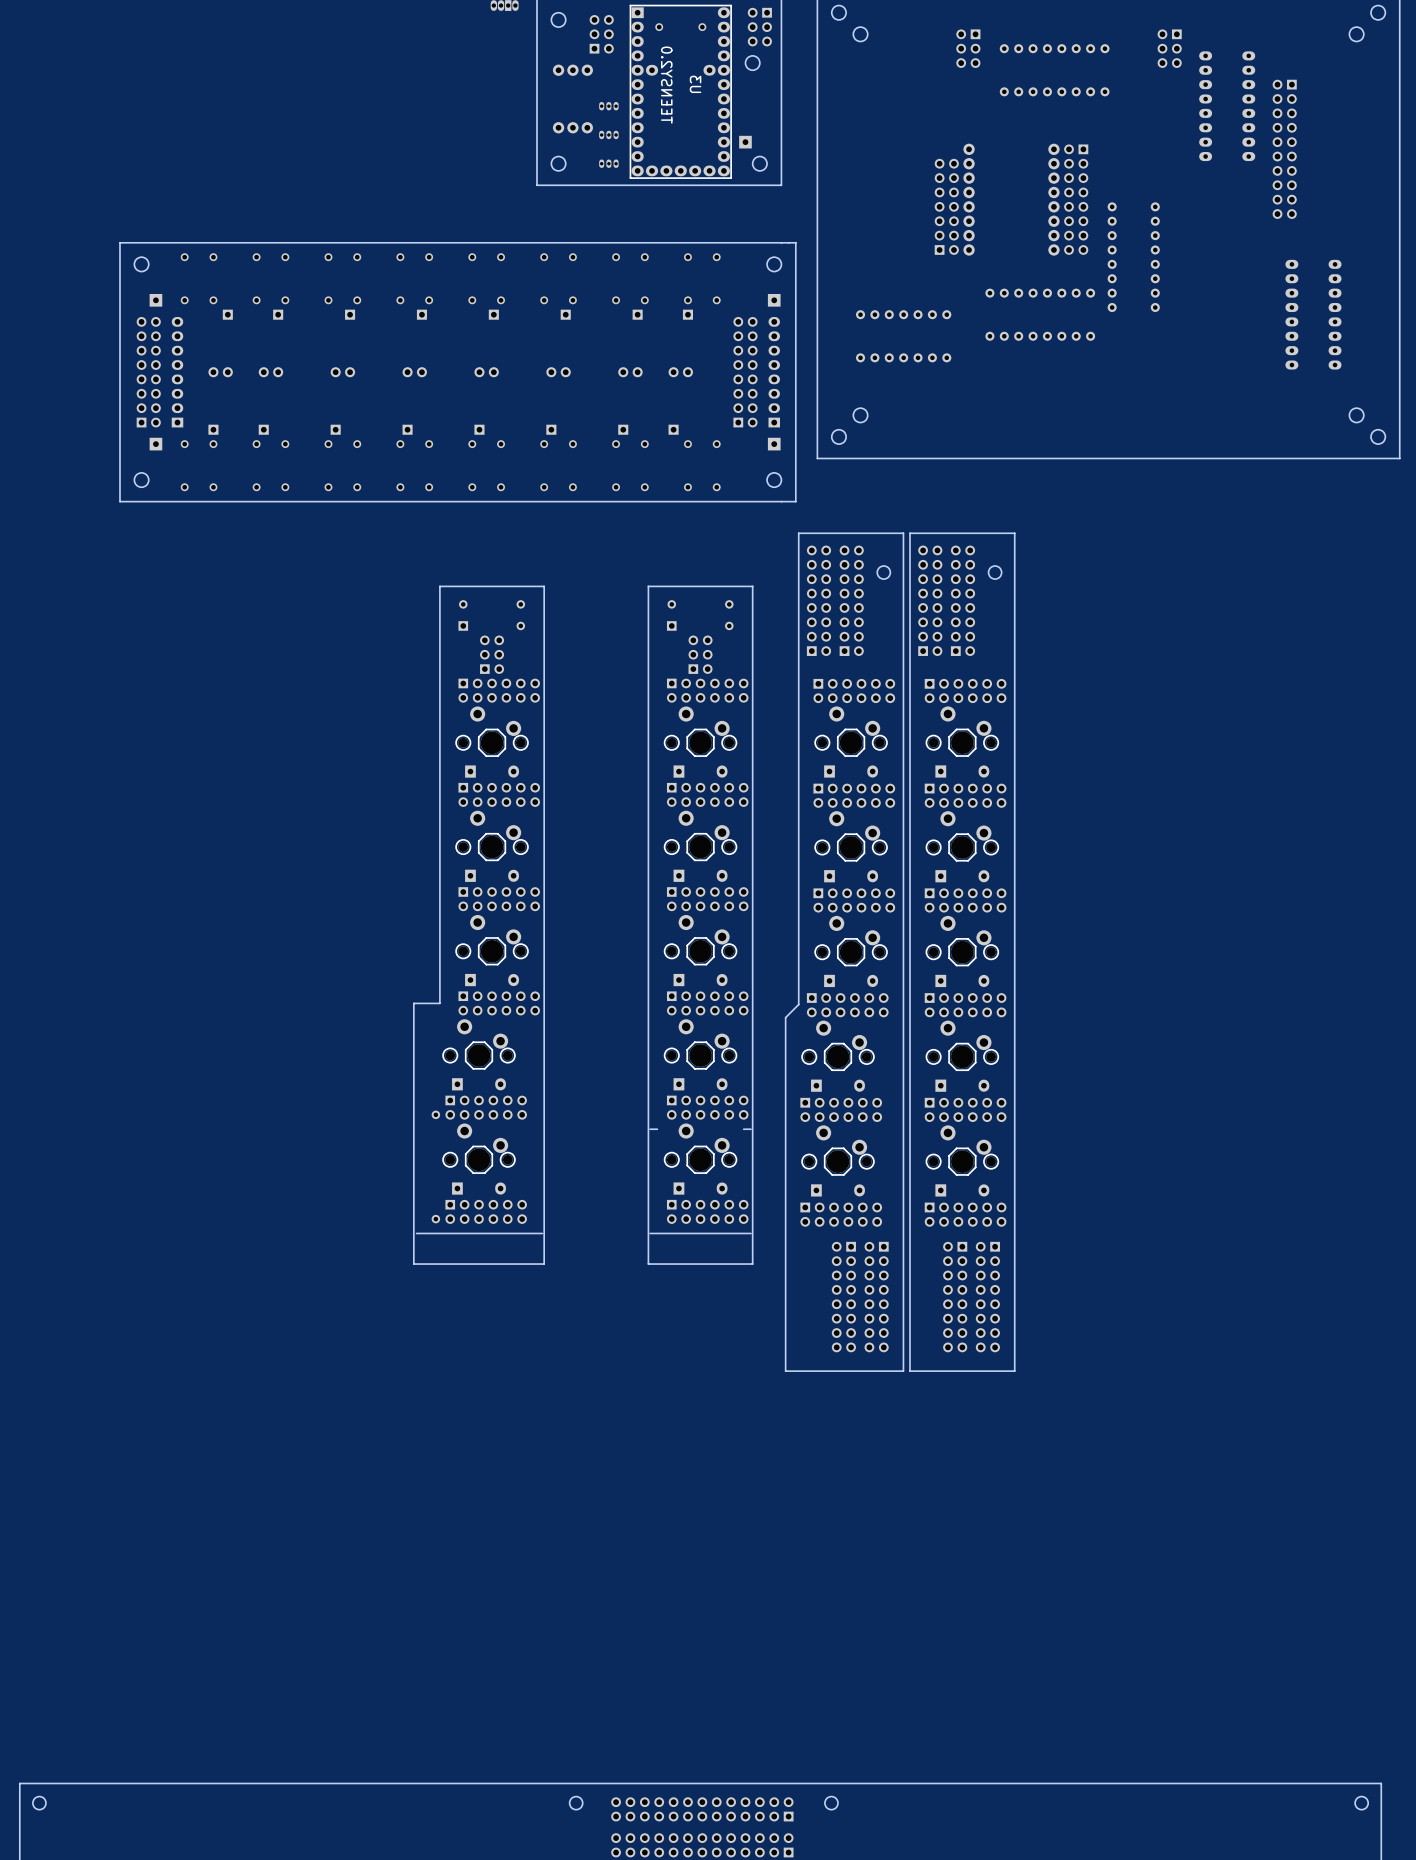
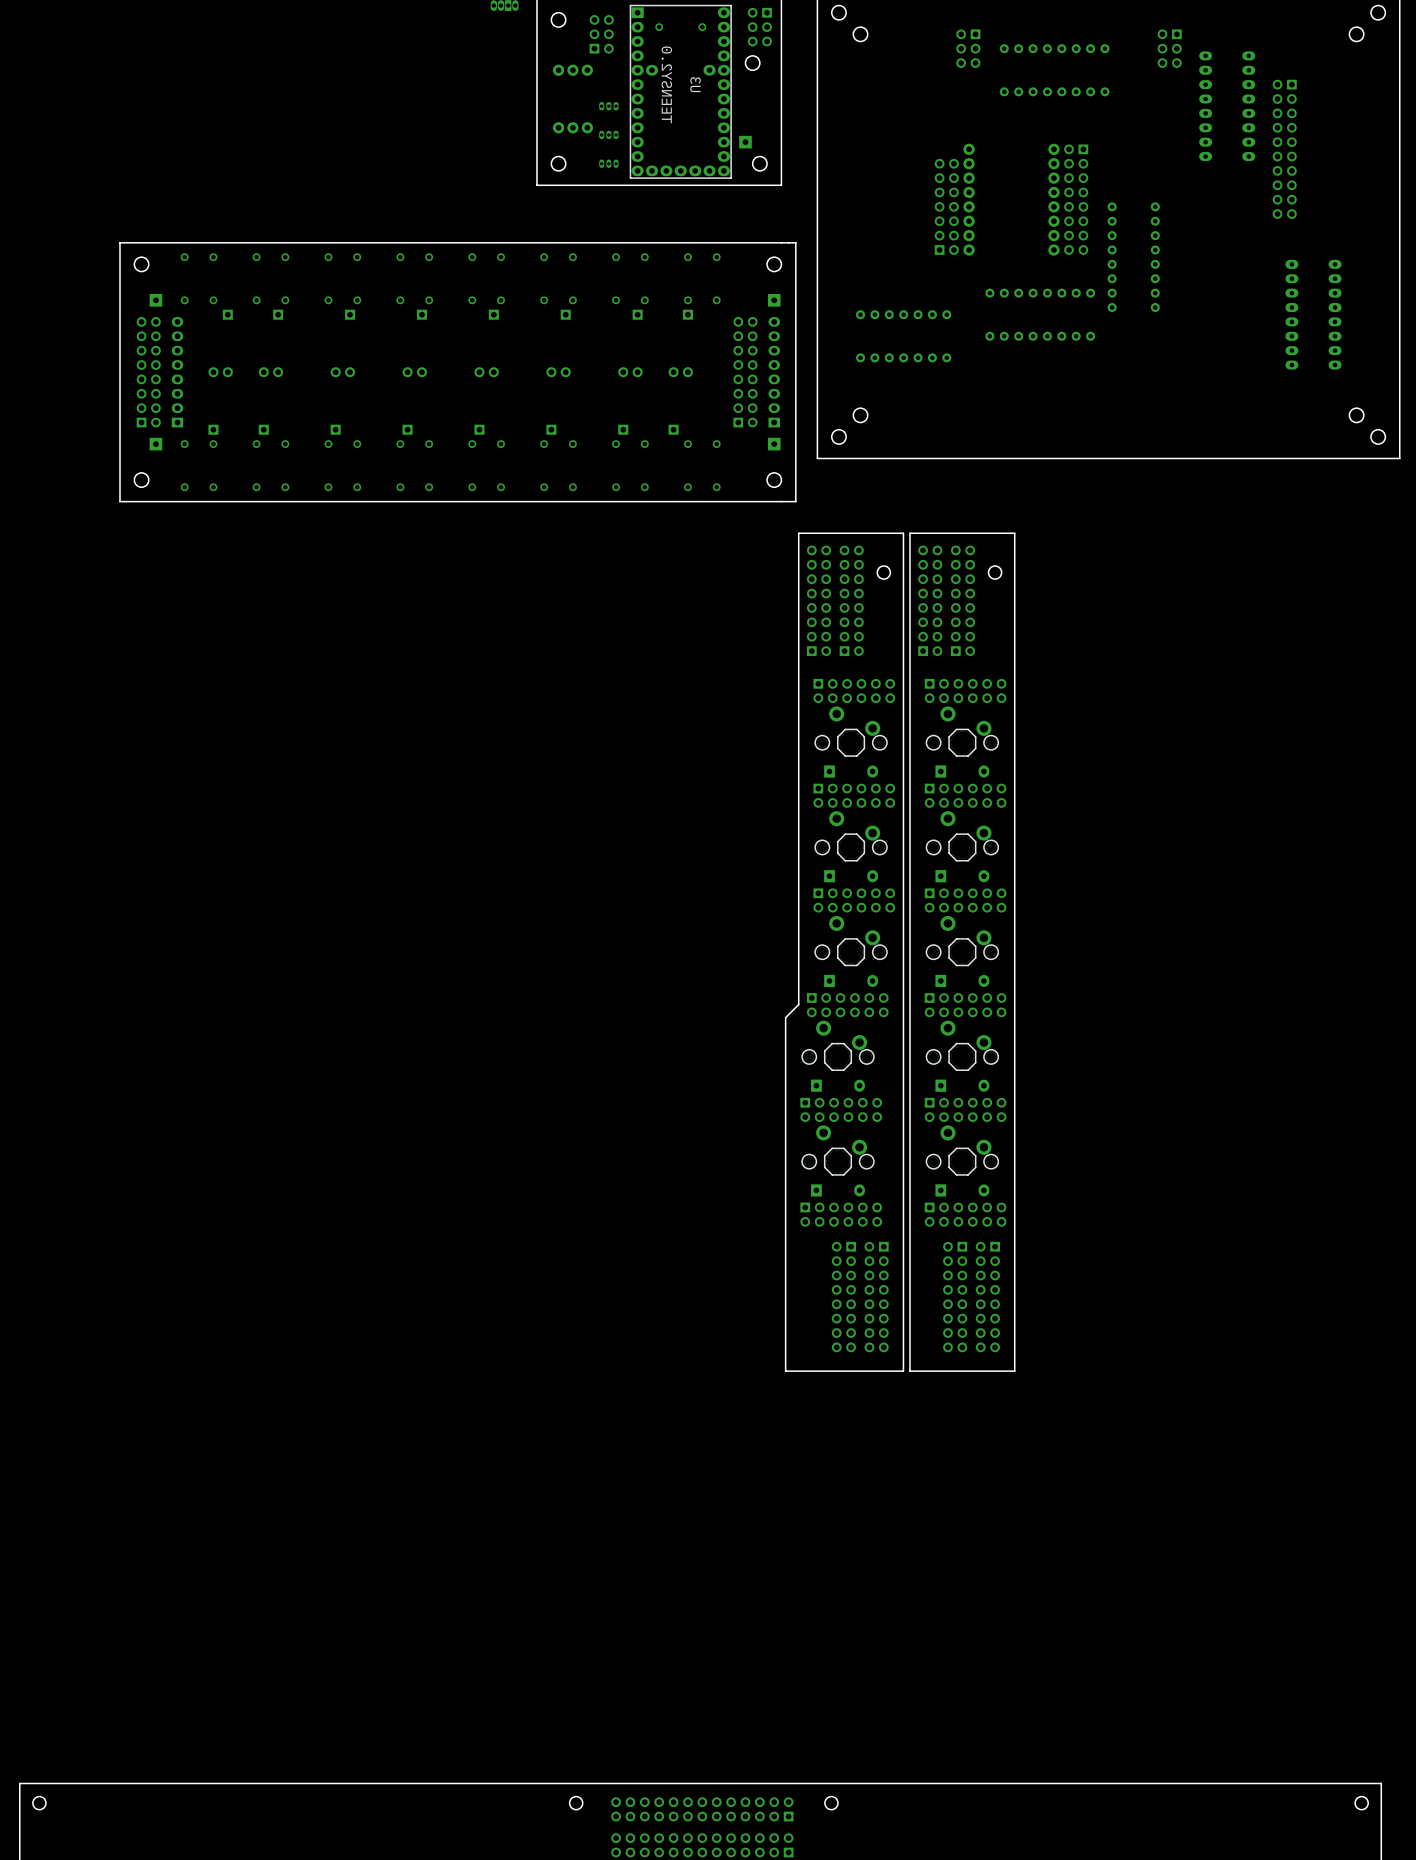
board edge: (544, 586) (439, 586) (439, 1003) (413, 1003) (413, 1264) (544, 1264) (544, 586) -> none
board edge: (752, 586) (648, 586) (648, 1264) (752, 1264) (752, 586) -> none
part: (463, 604) -> none
part: (520, 604) -> none
part: (671, 604) -> none
part: (729, 604) -> none
part: (463, 625) -> none
part: (520, 625) -> none
part: (671, 625) -> none
part: (729, 625) -> none
part: (492, 654) -> none
part: (700, 654) -> none
part: (499, 690) -> none
part: (707, 690) -> none
part: (492, 742) -> none
part: (700, 742) -> none
part: (499, 794) -> none
part: (707, 794) -> none
part: (492, 846) -> none
part: (700, 846) -> none
part: (499, 899) -> none
part: (707, 899) -> none
part: (492, 950) -> none
part: (700, 950) -> none
part: (499, 1003) -> none
part: (707, 1003) -> none
part: (479, 1054) -> none
part: (700, 1054) -> none
part: (486, 1107) -> none
part: (707, 1107) -> none
part: (435, 1114) -> none
board edge: (657, 1129) (650, 1129) -> none
board edge: (750, 1129) (743, 1129) -> none
part: (479, 1159) -> none
part: (700, 1159) -> none
part: (486, 1211) -> none
part: (707, 1211) -> none
part: (435, 1219) -> none
board edge: (542, 1233) (416, 1233) -> none
board edge: (750, 1233) (650, 1233) -> none

